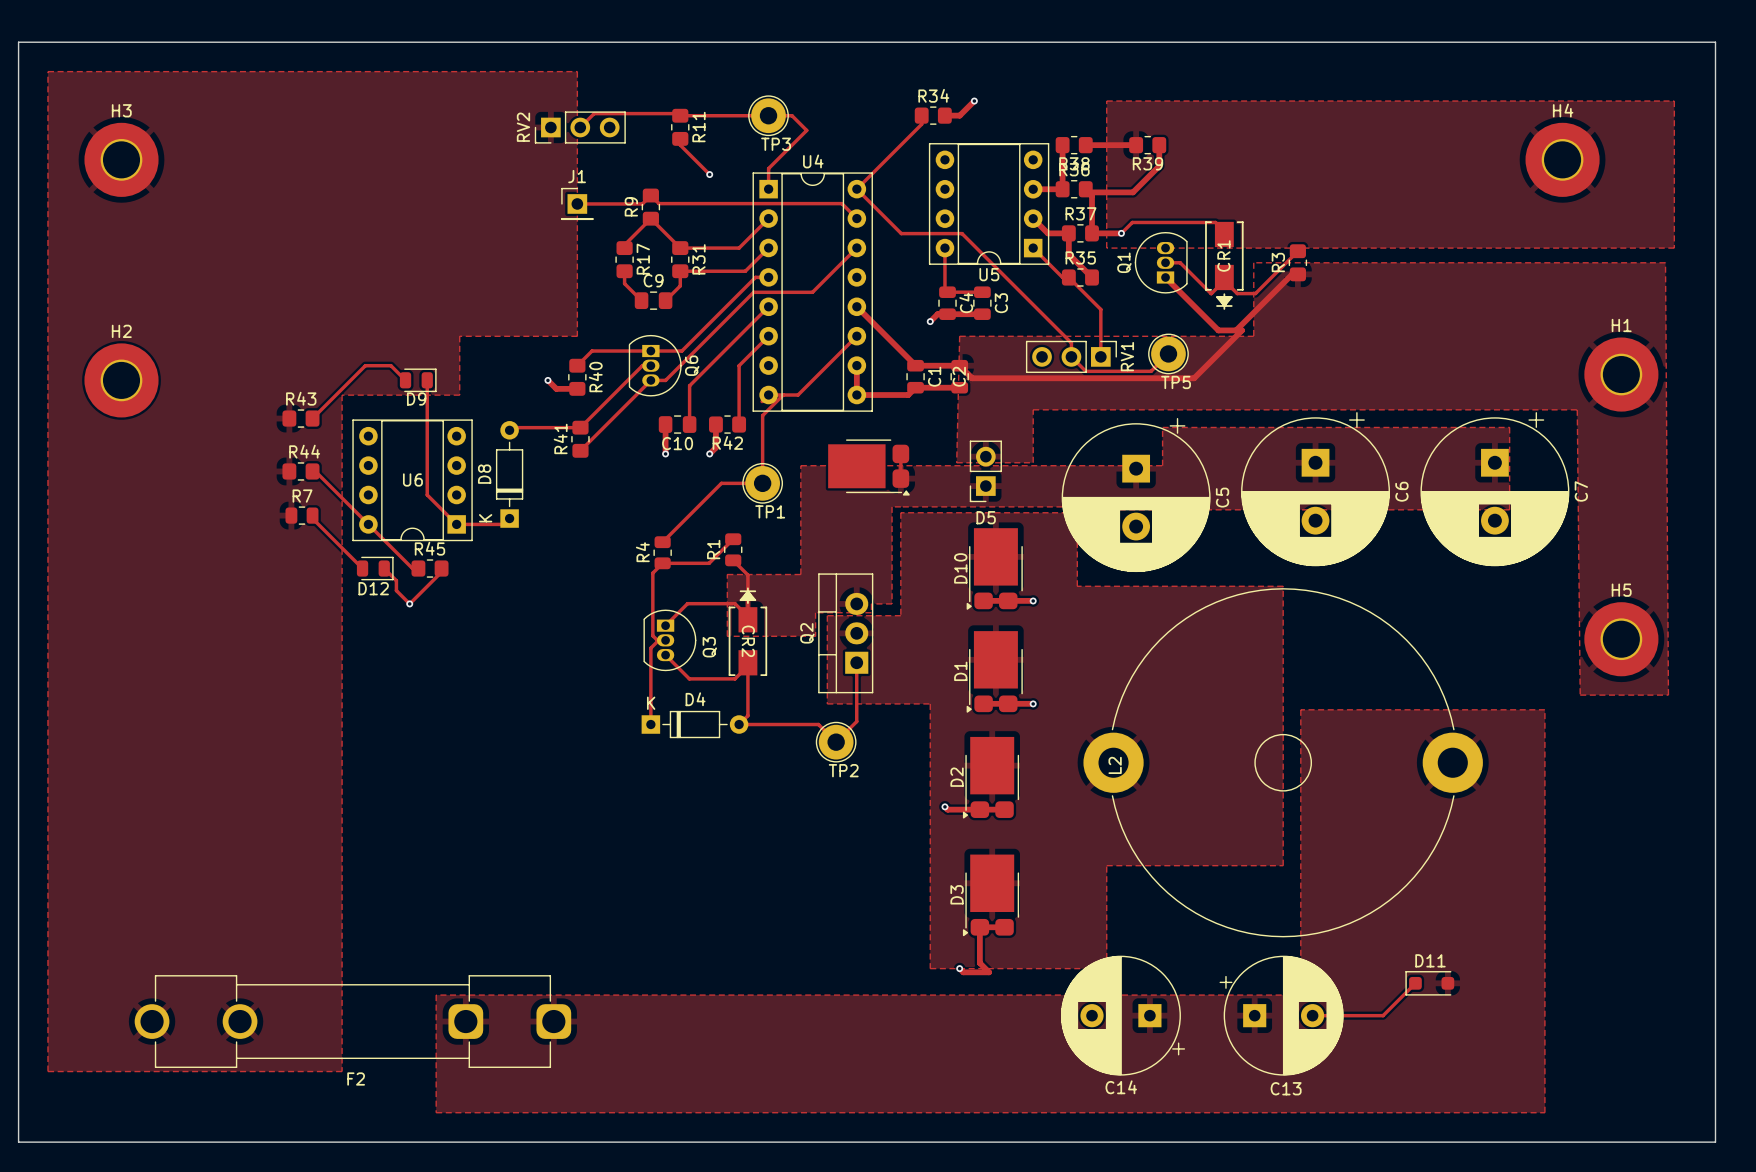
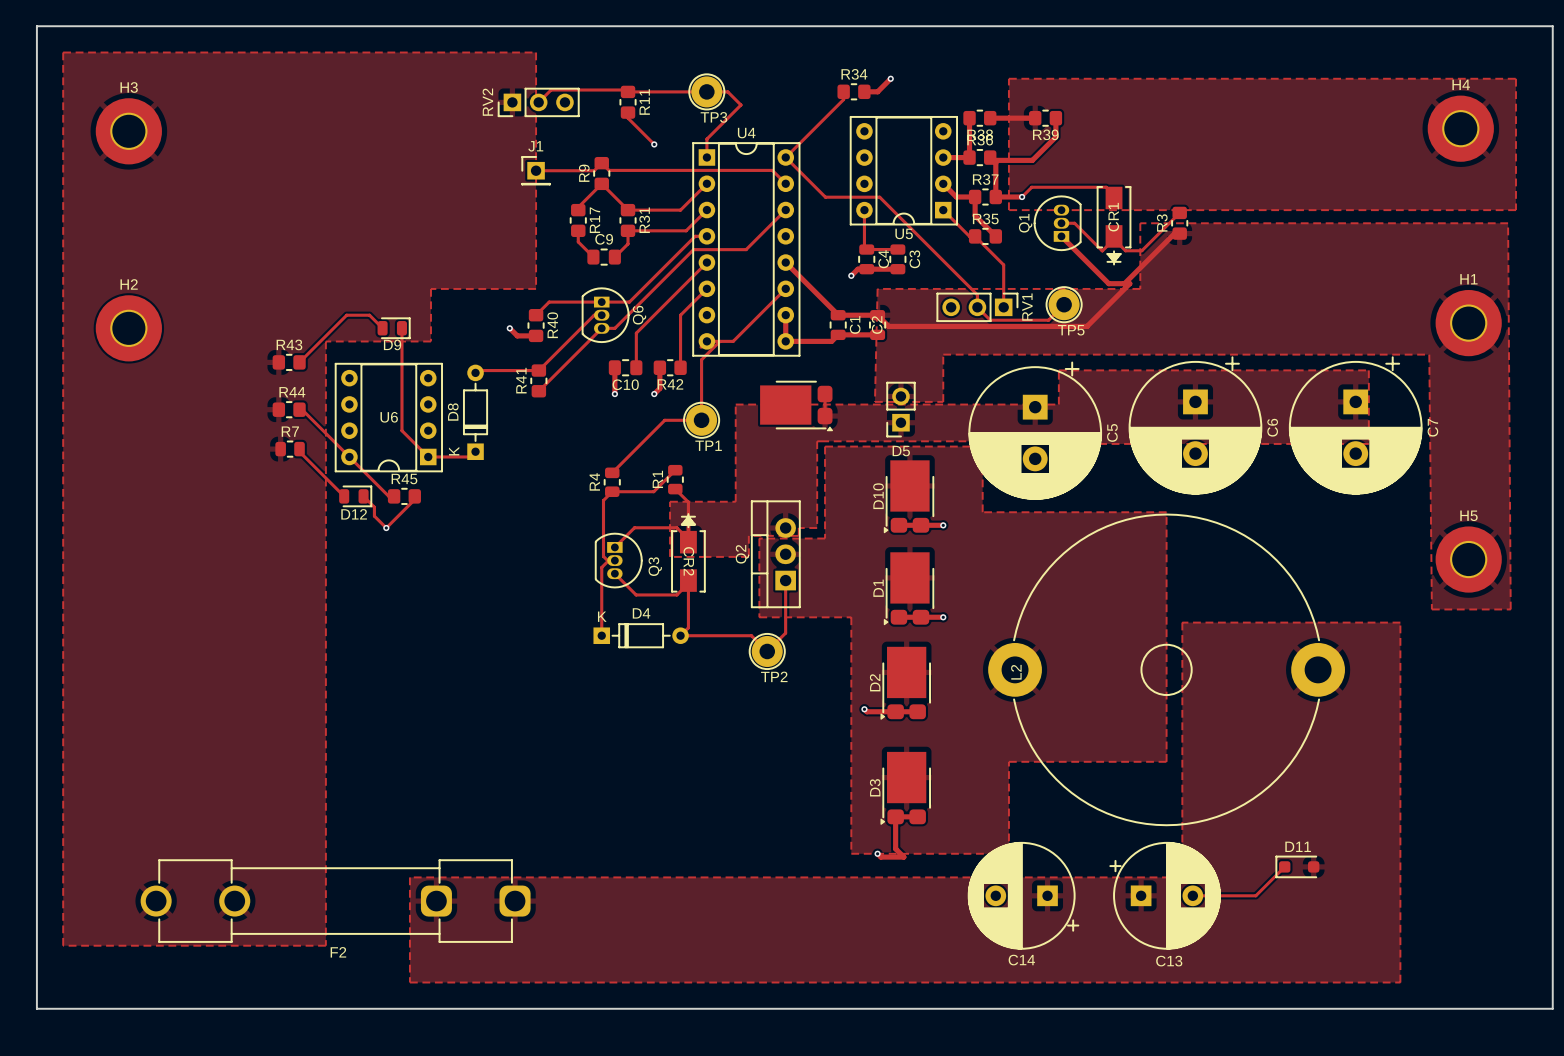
H4 position: (1562, 159) -> (1460, 128)

